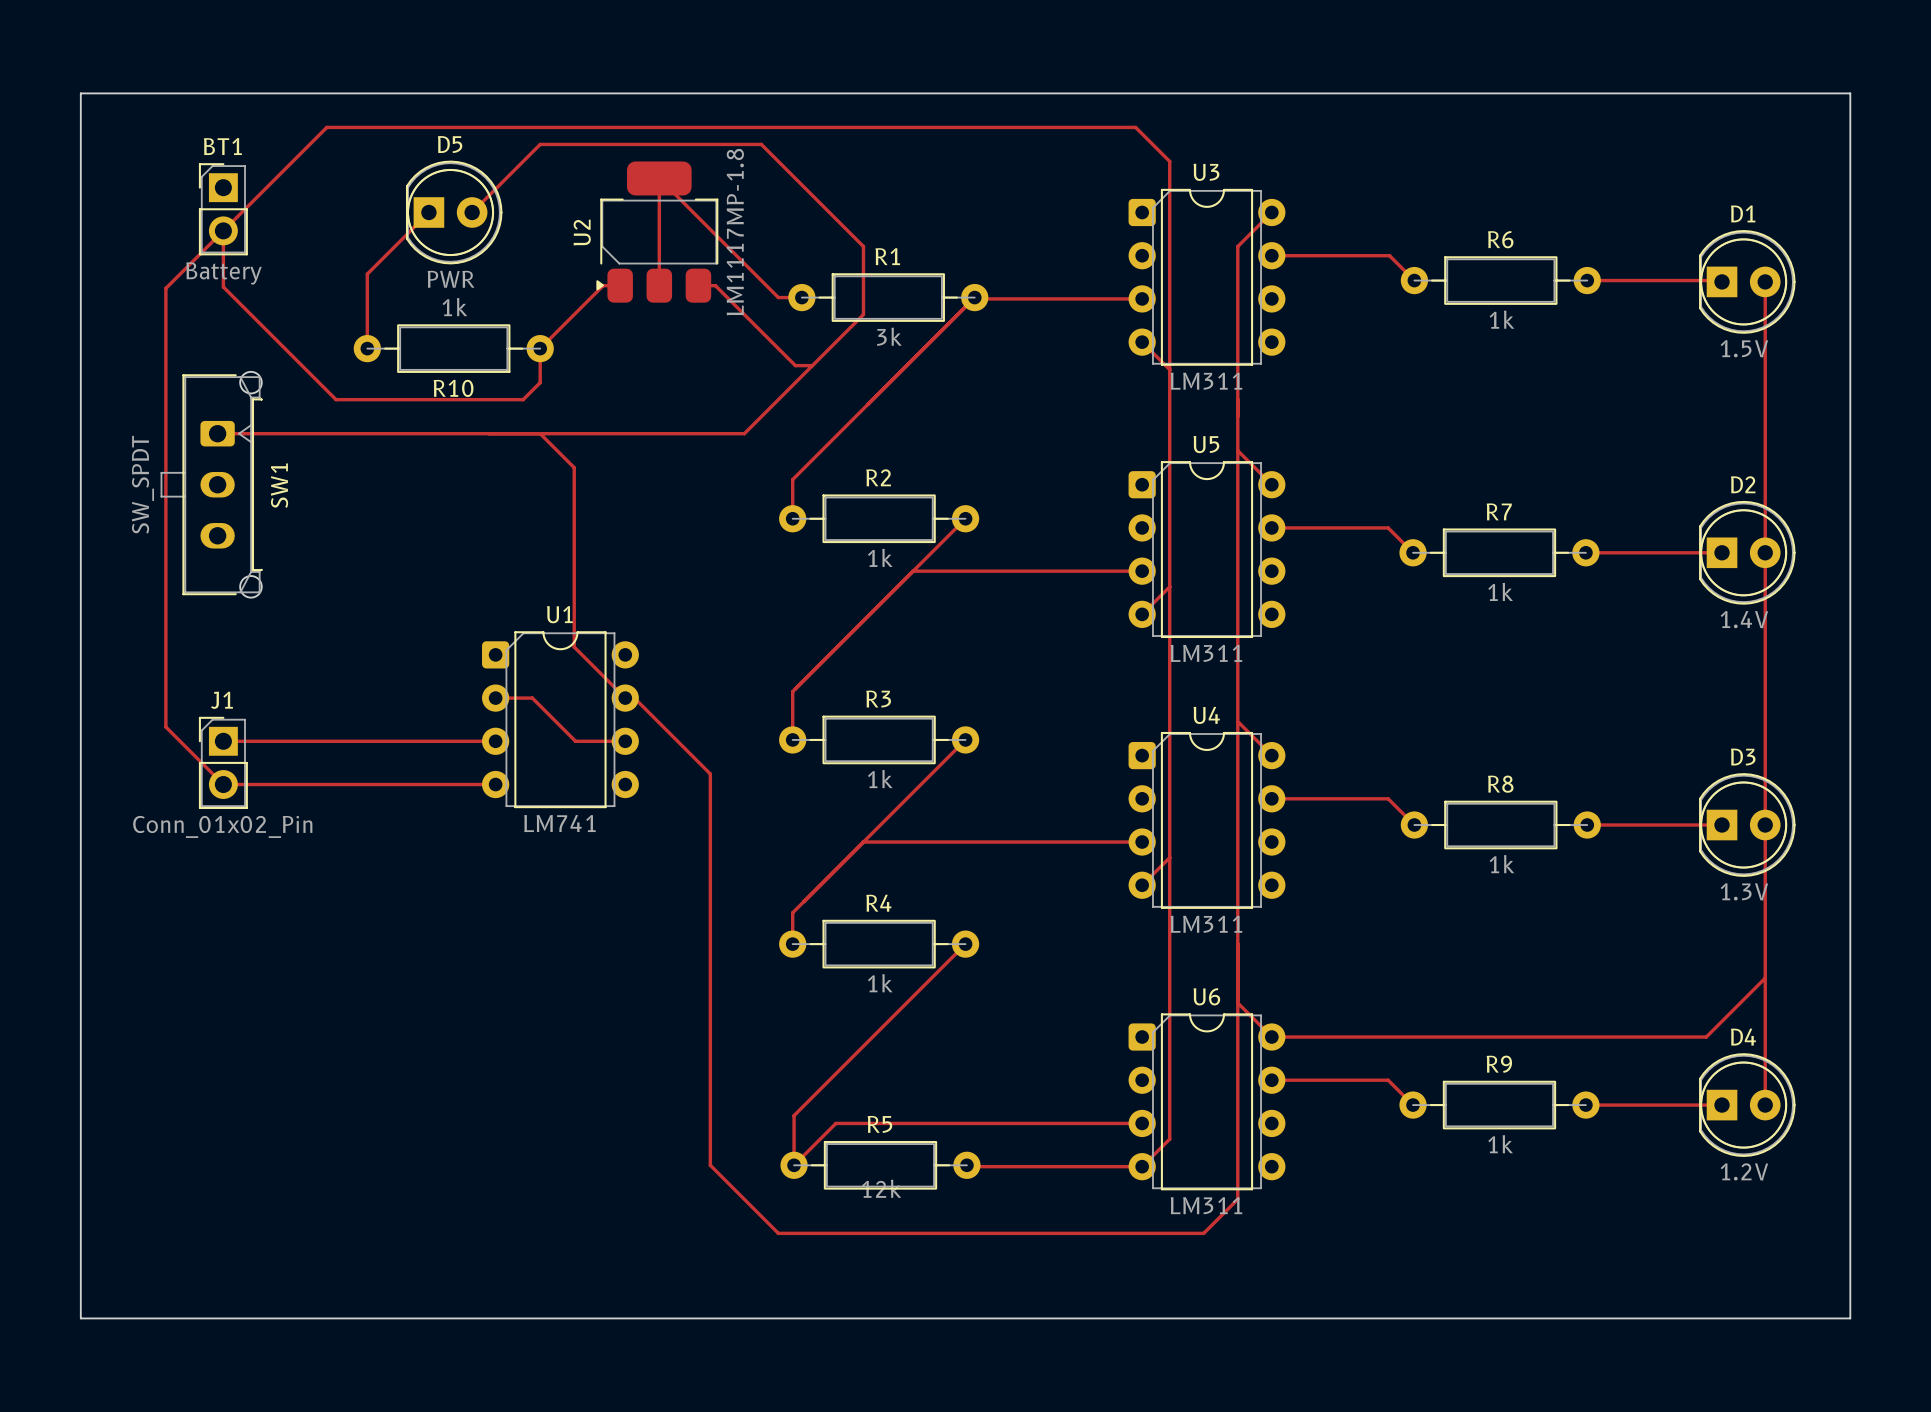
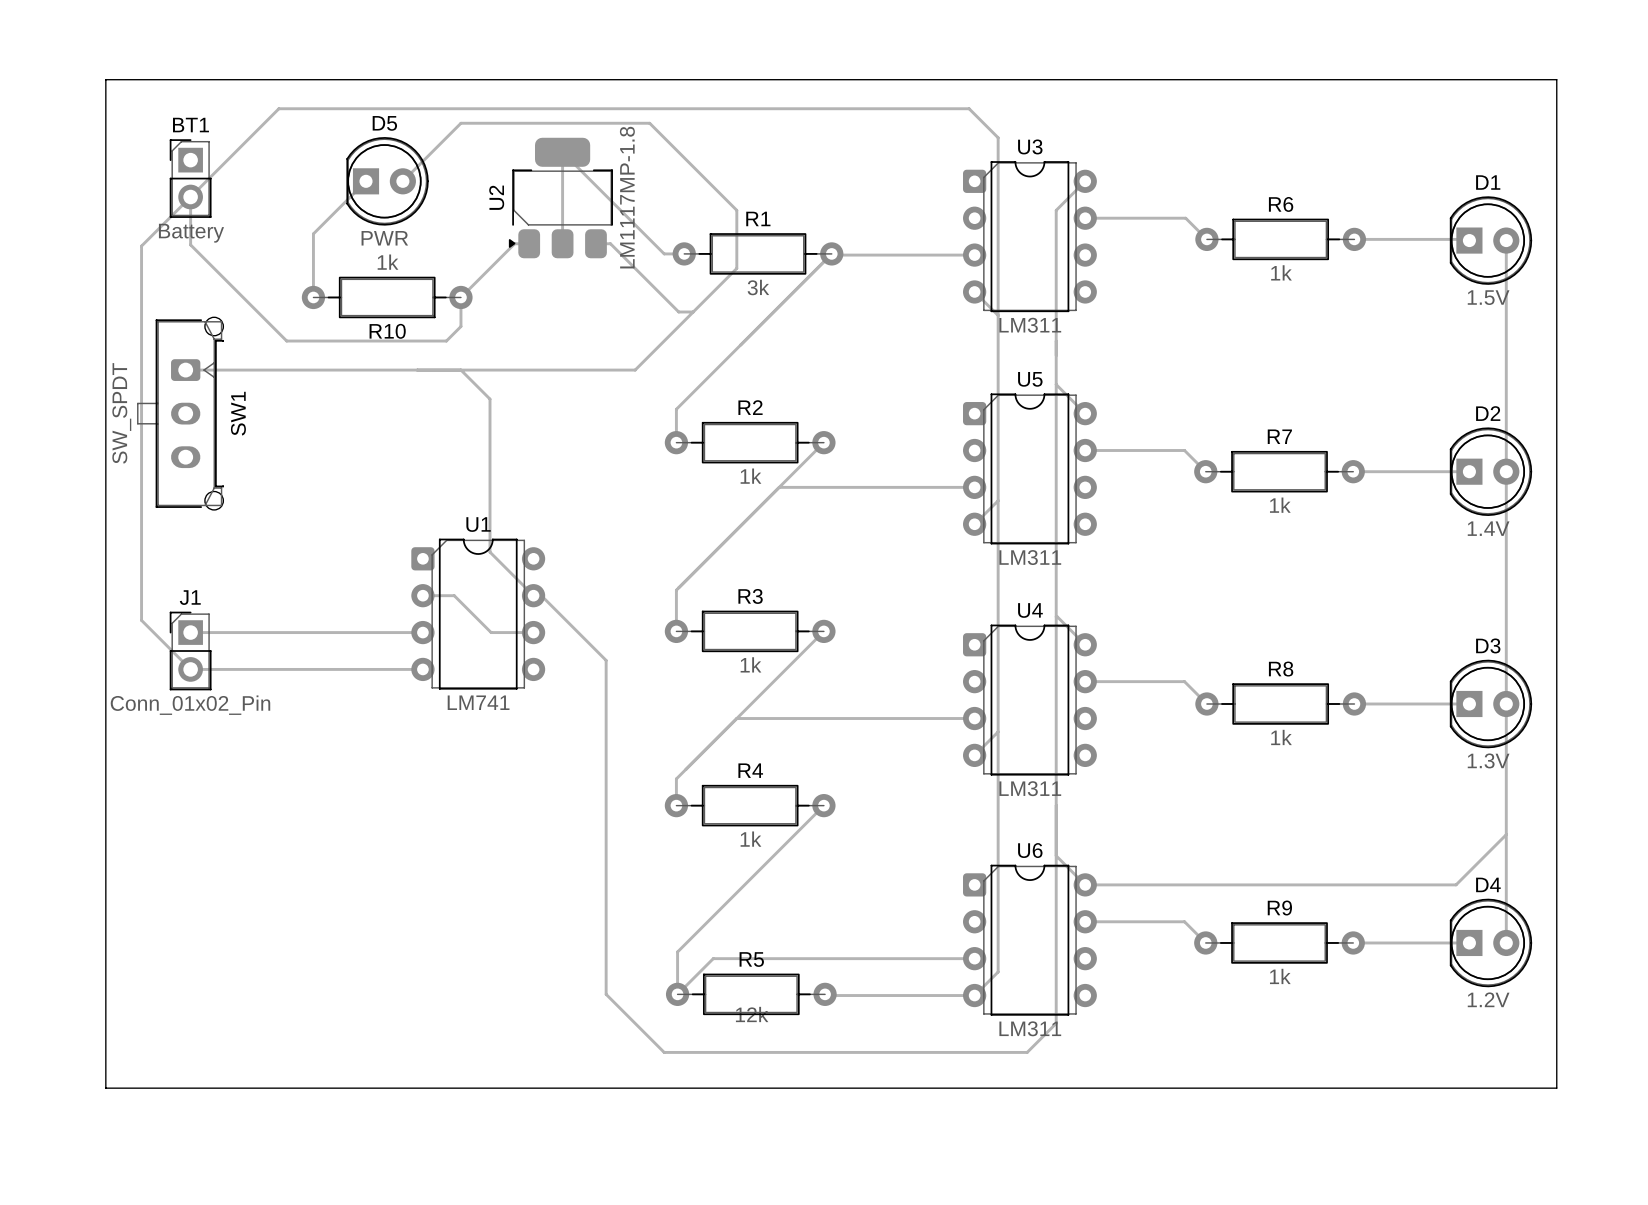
board edge: (124, 93) (80, 93) (80, 1318) (1850, 1318) (1850, 93) (1824, 93) -> (105, 79) (105, 1088) (1556, 1088) (1556, 79)

